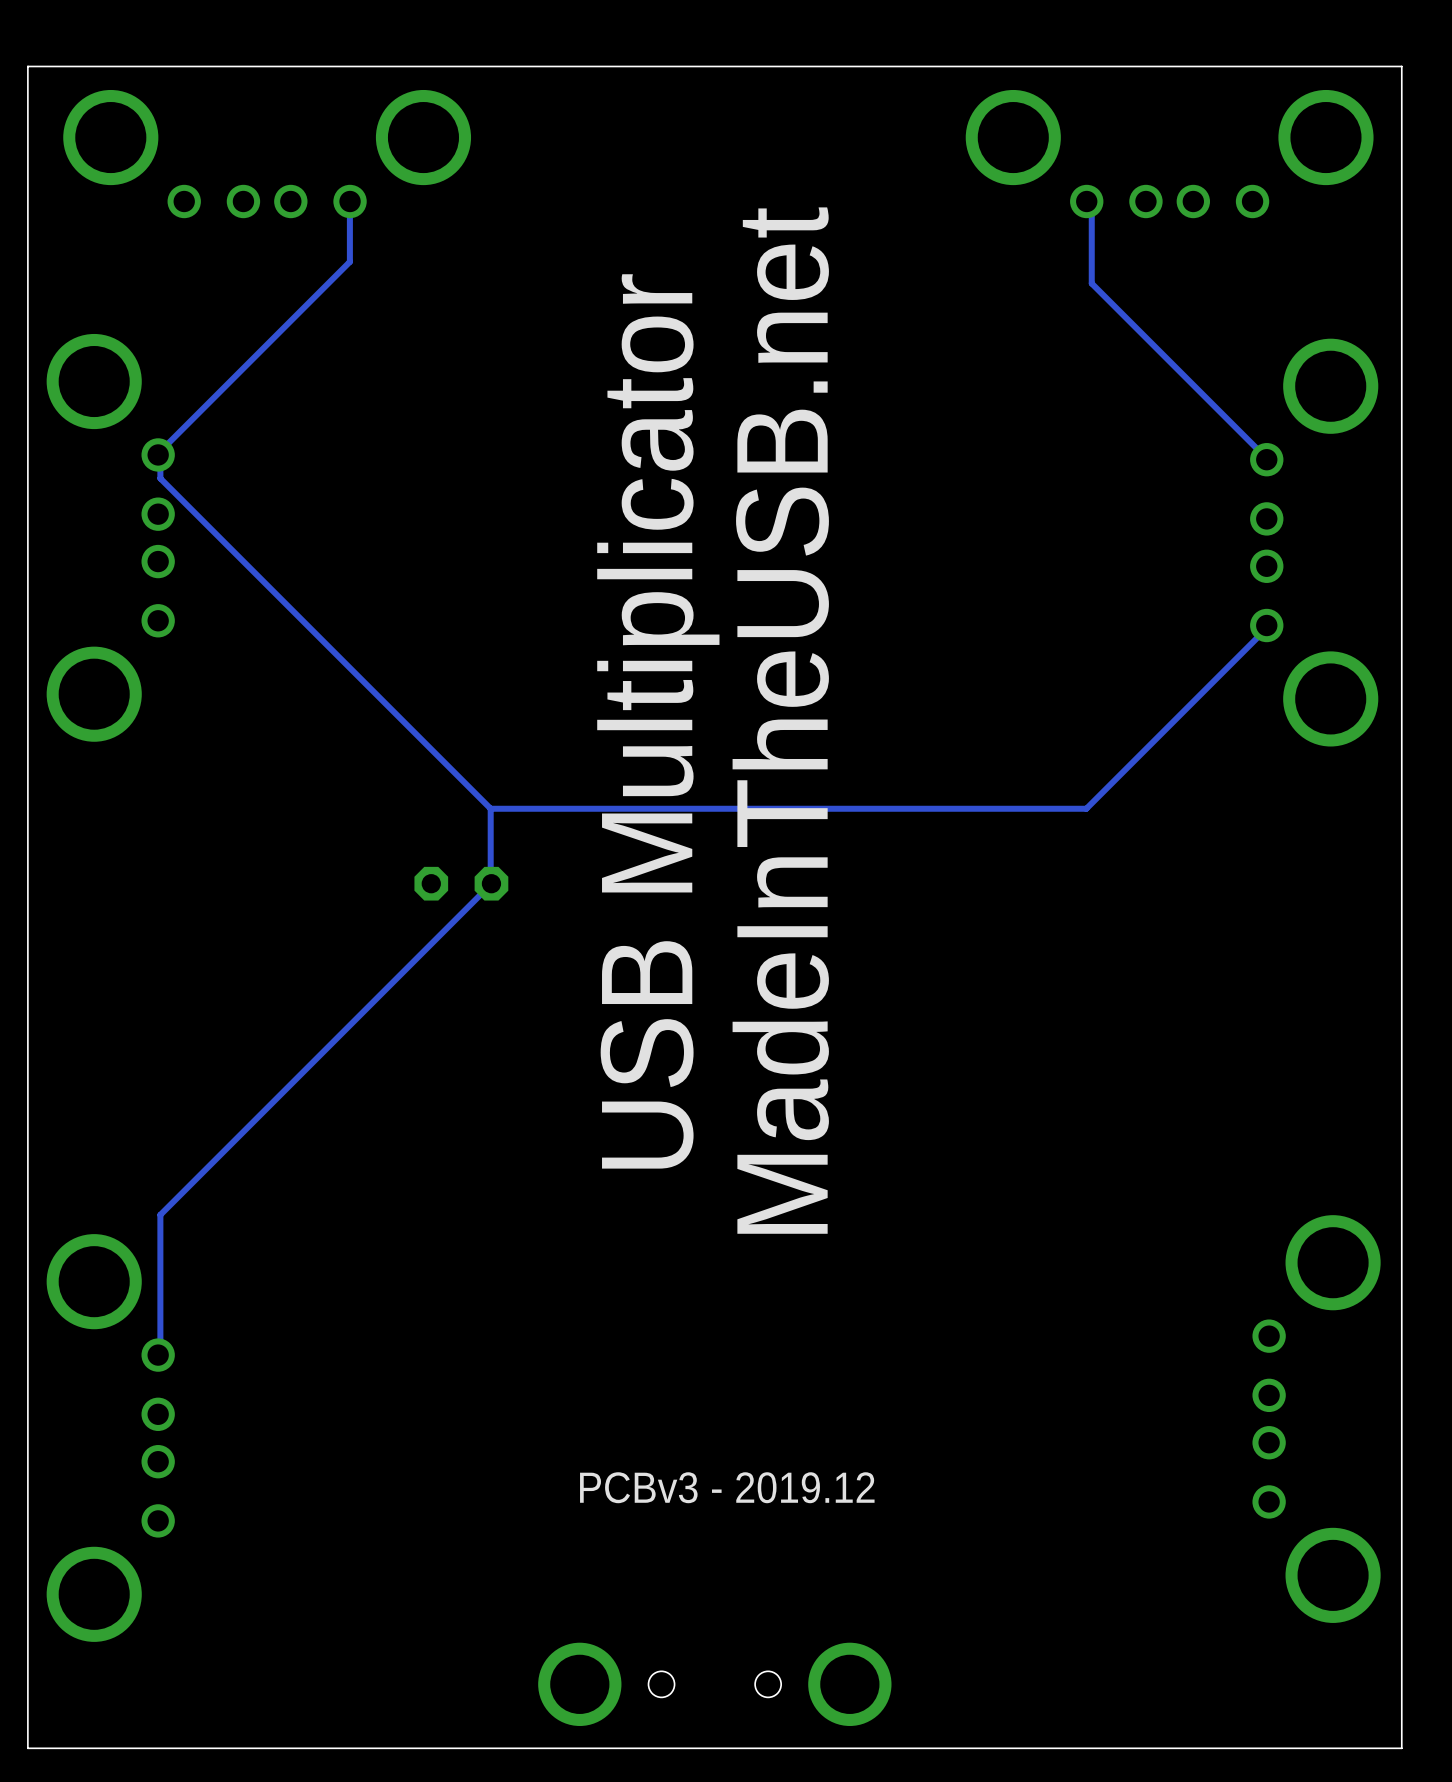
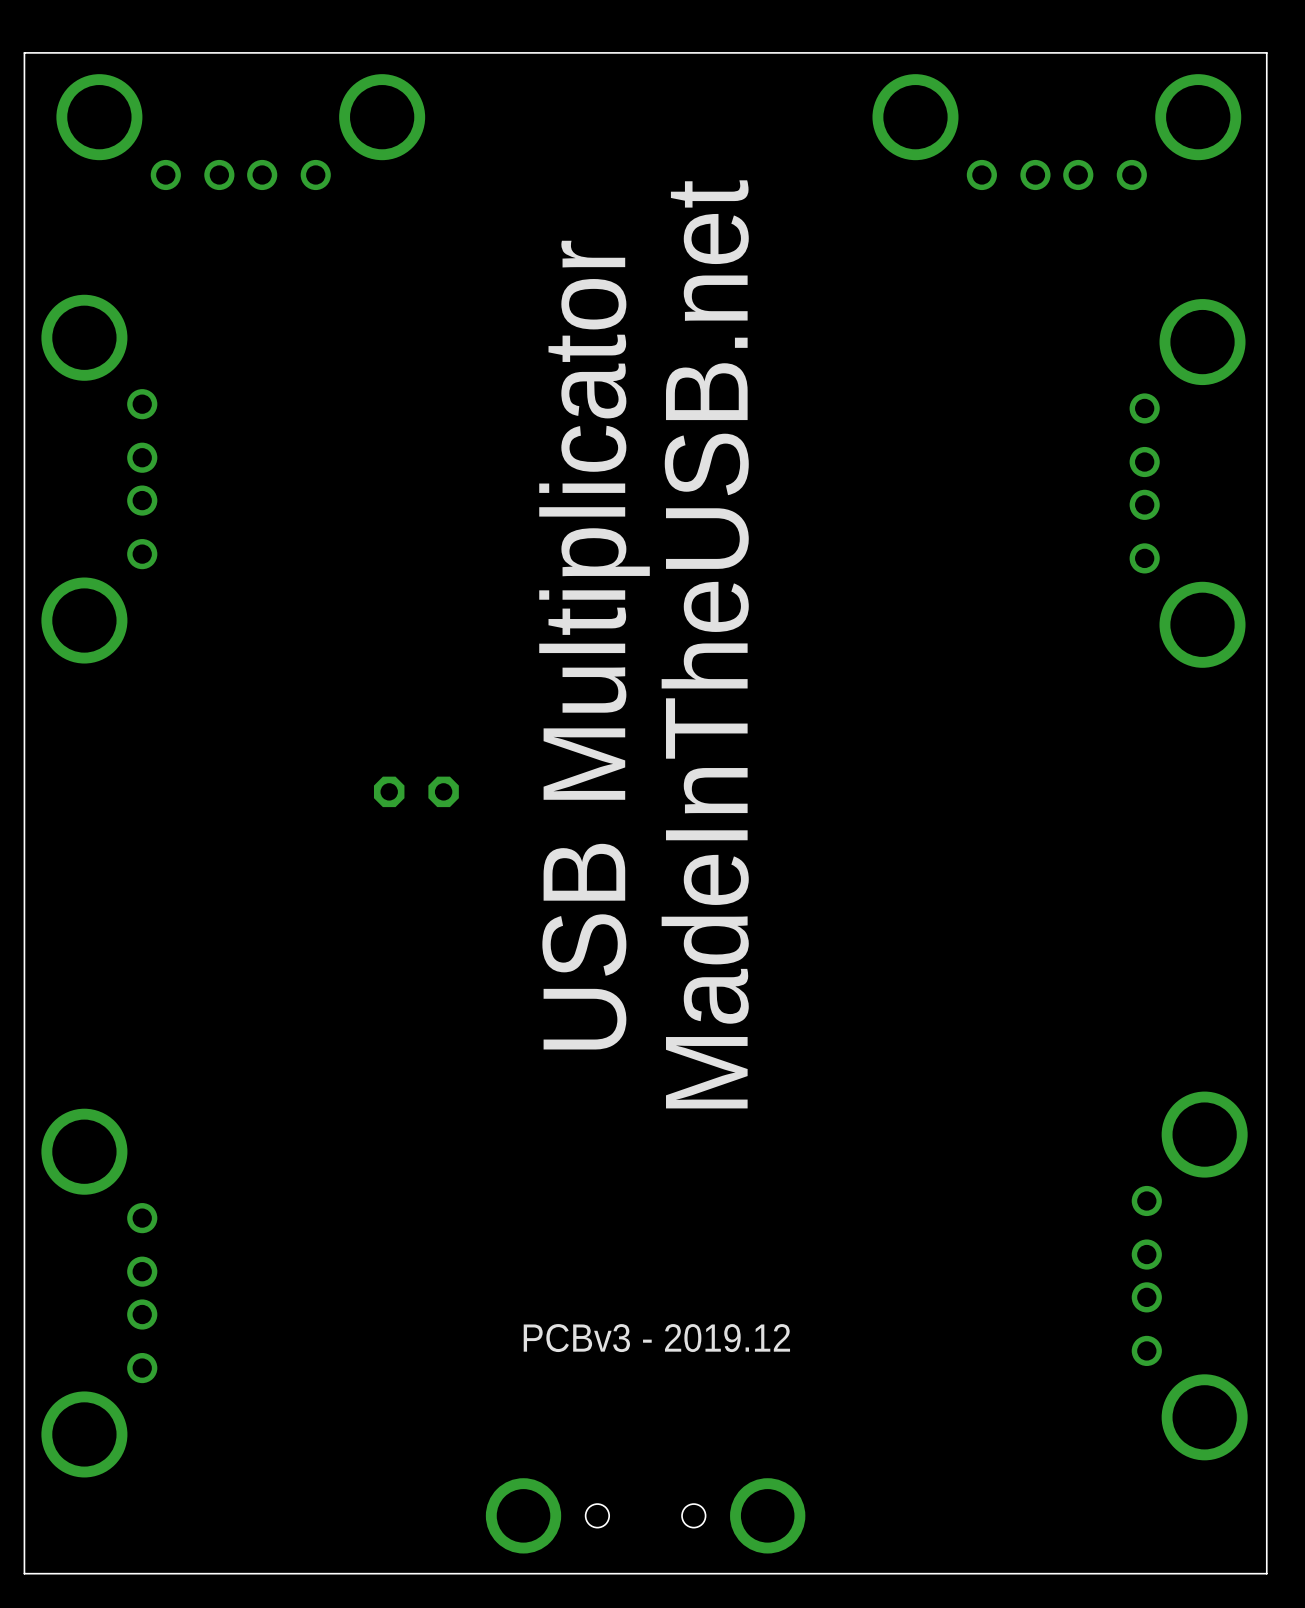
track: (350, 201) (349, 261) (160, 451) (158, 454) (160, 456) (160, 478) (490, 808) -> none
track: (1086, 201) (1091, 202) (1091, 283) (1266, 459) -> none
track: (1266, 625) (1265, 630) (1086, 808) (490, 808) -> none
track: (490, 808) (491, 883) (160, 1214) (160, 1350) (158, 1355) -> none

